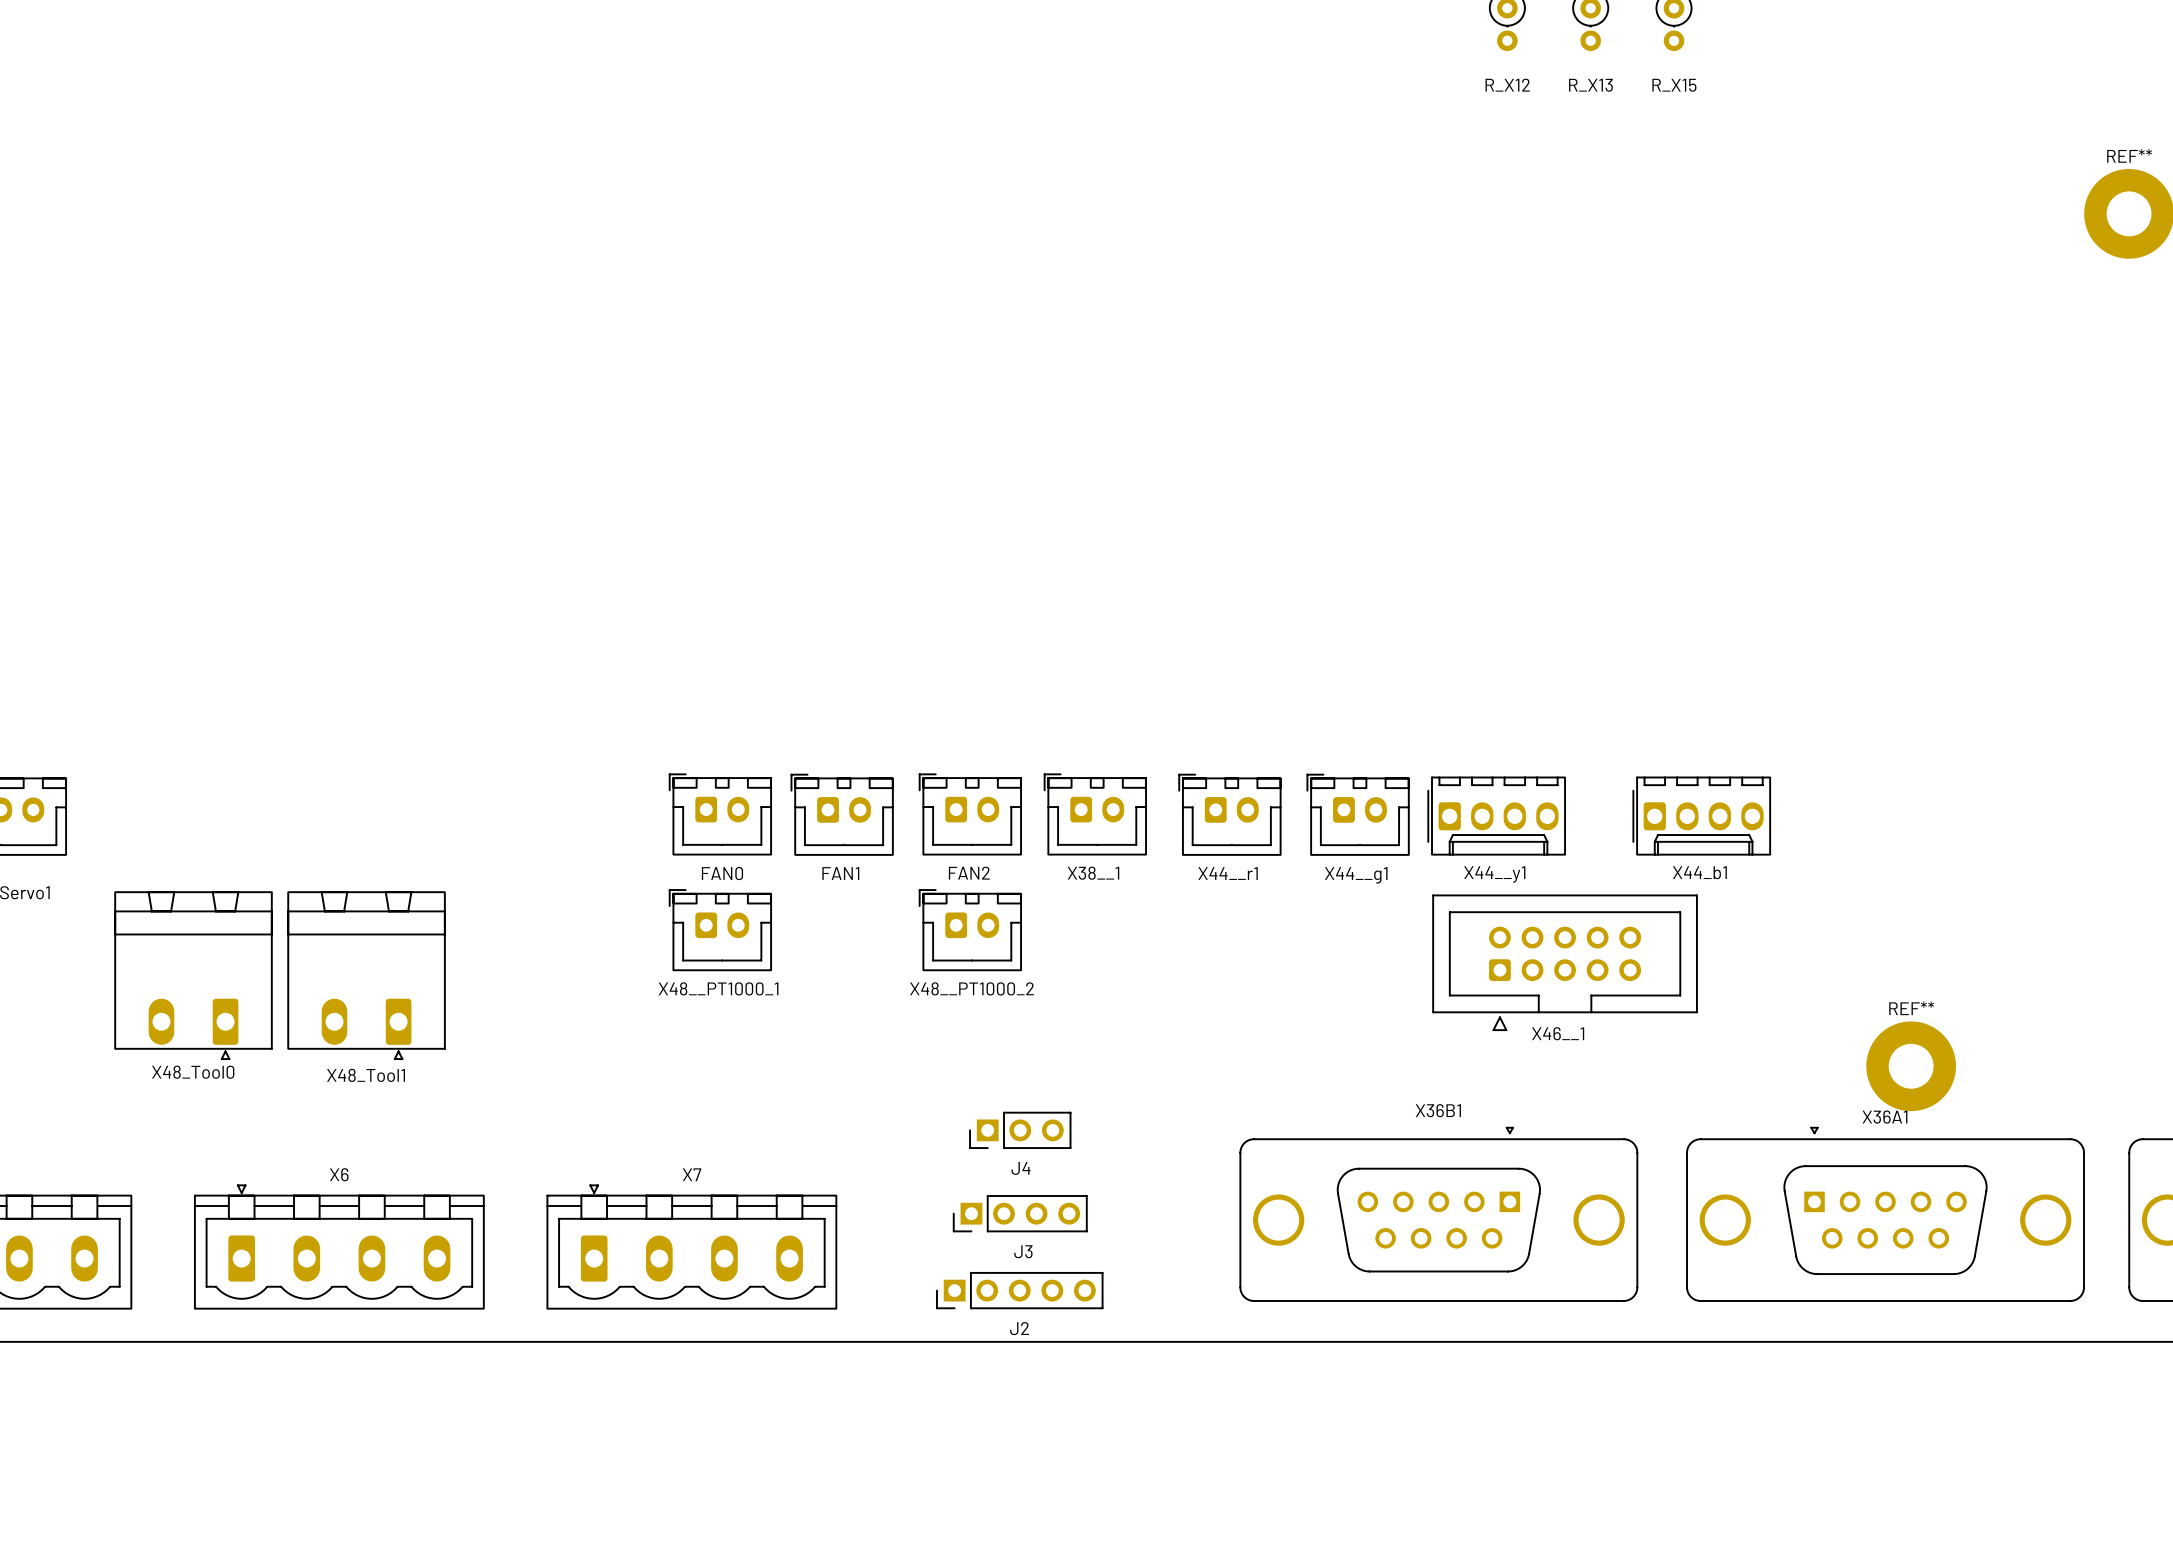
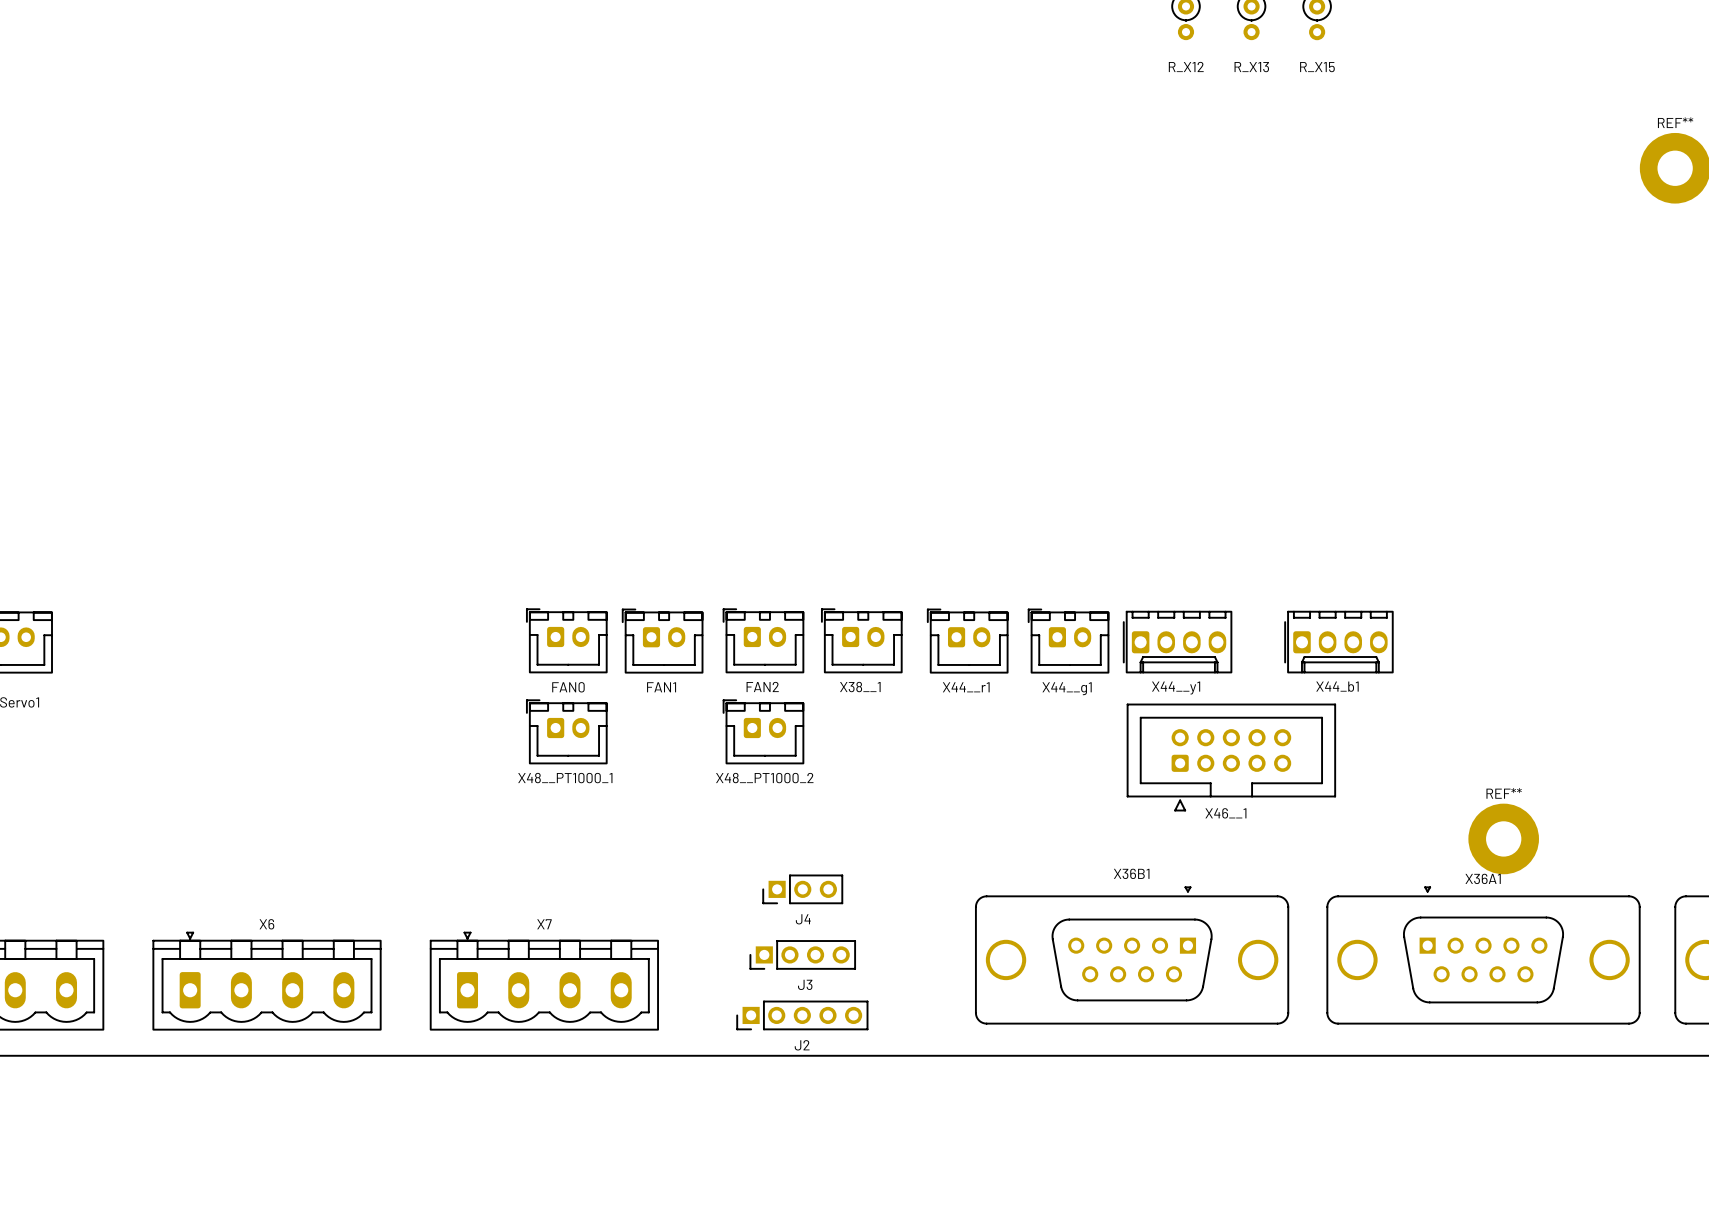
X48_Tool0: (193, 975) -> none
X48_Tool1: (366, 975) -> none

